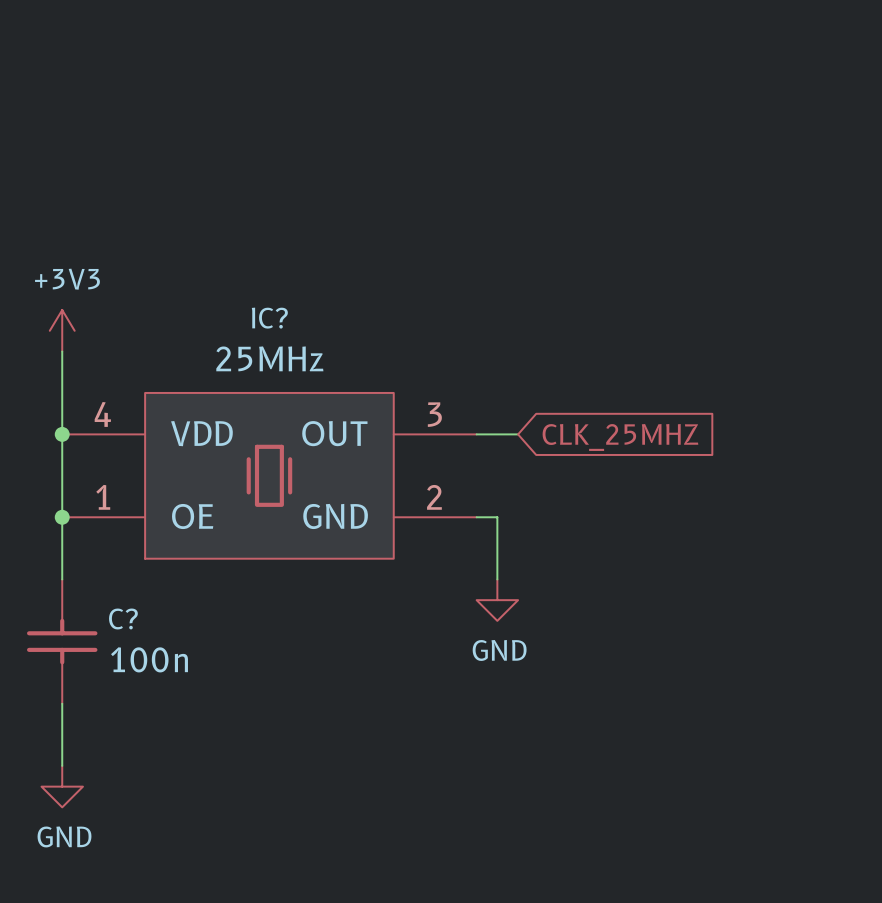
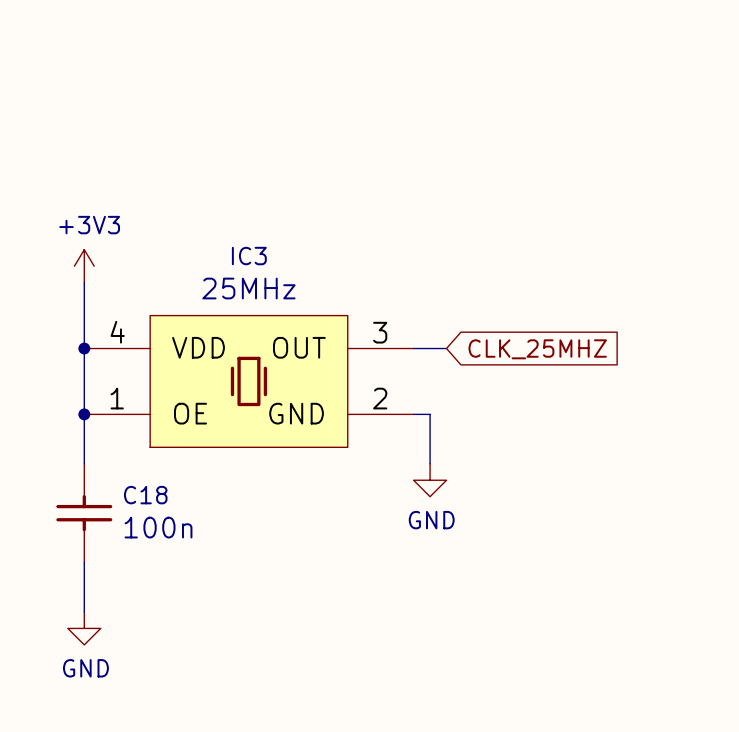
IC? name: IC? (269, 318) -> IC3 (249, 256)
C? name: C? (123, 618) -> C18 (145, 495)

